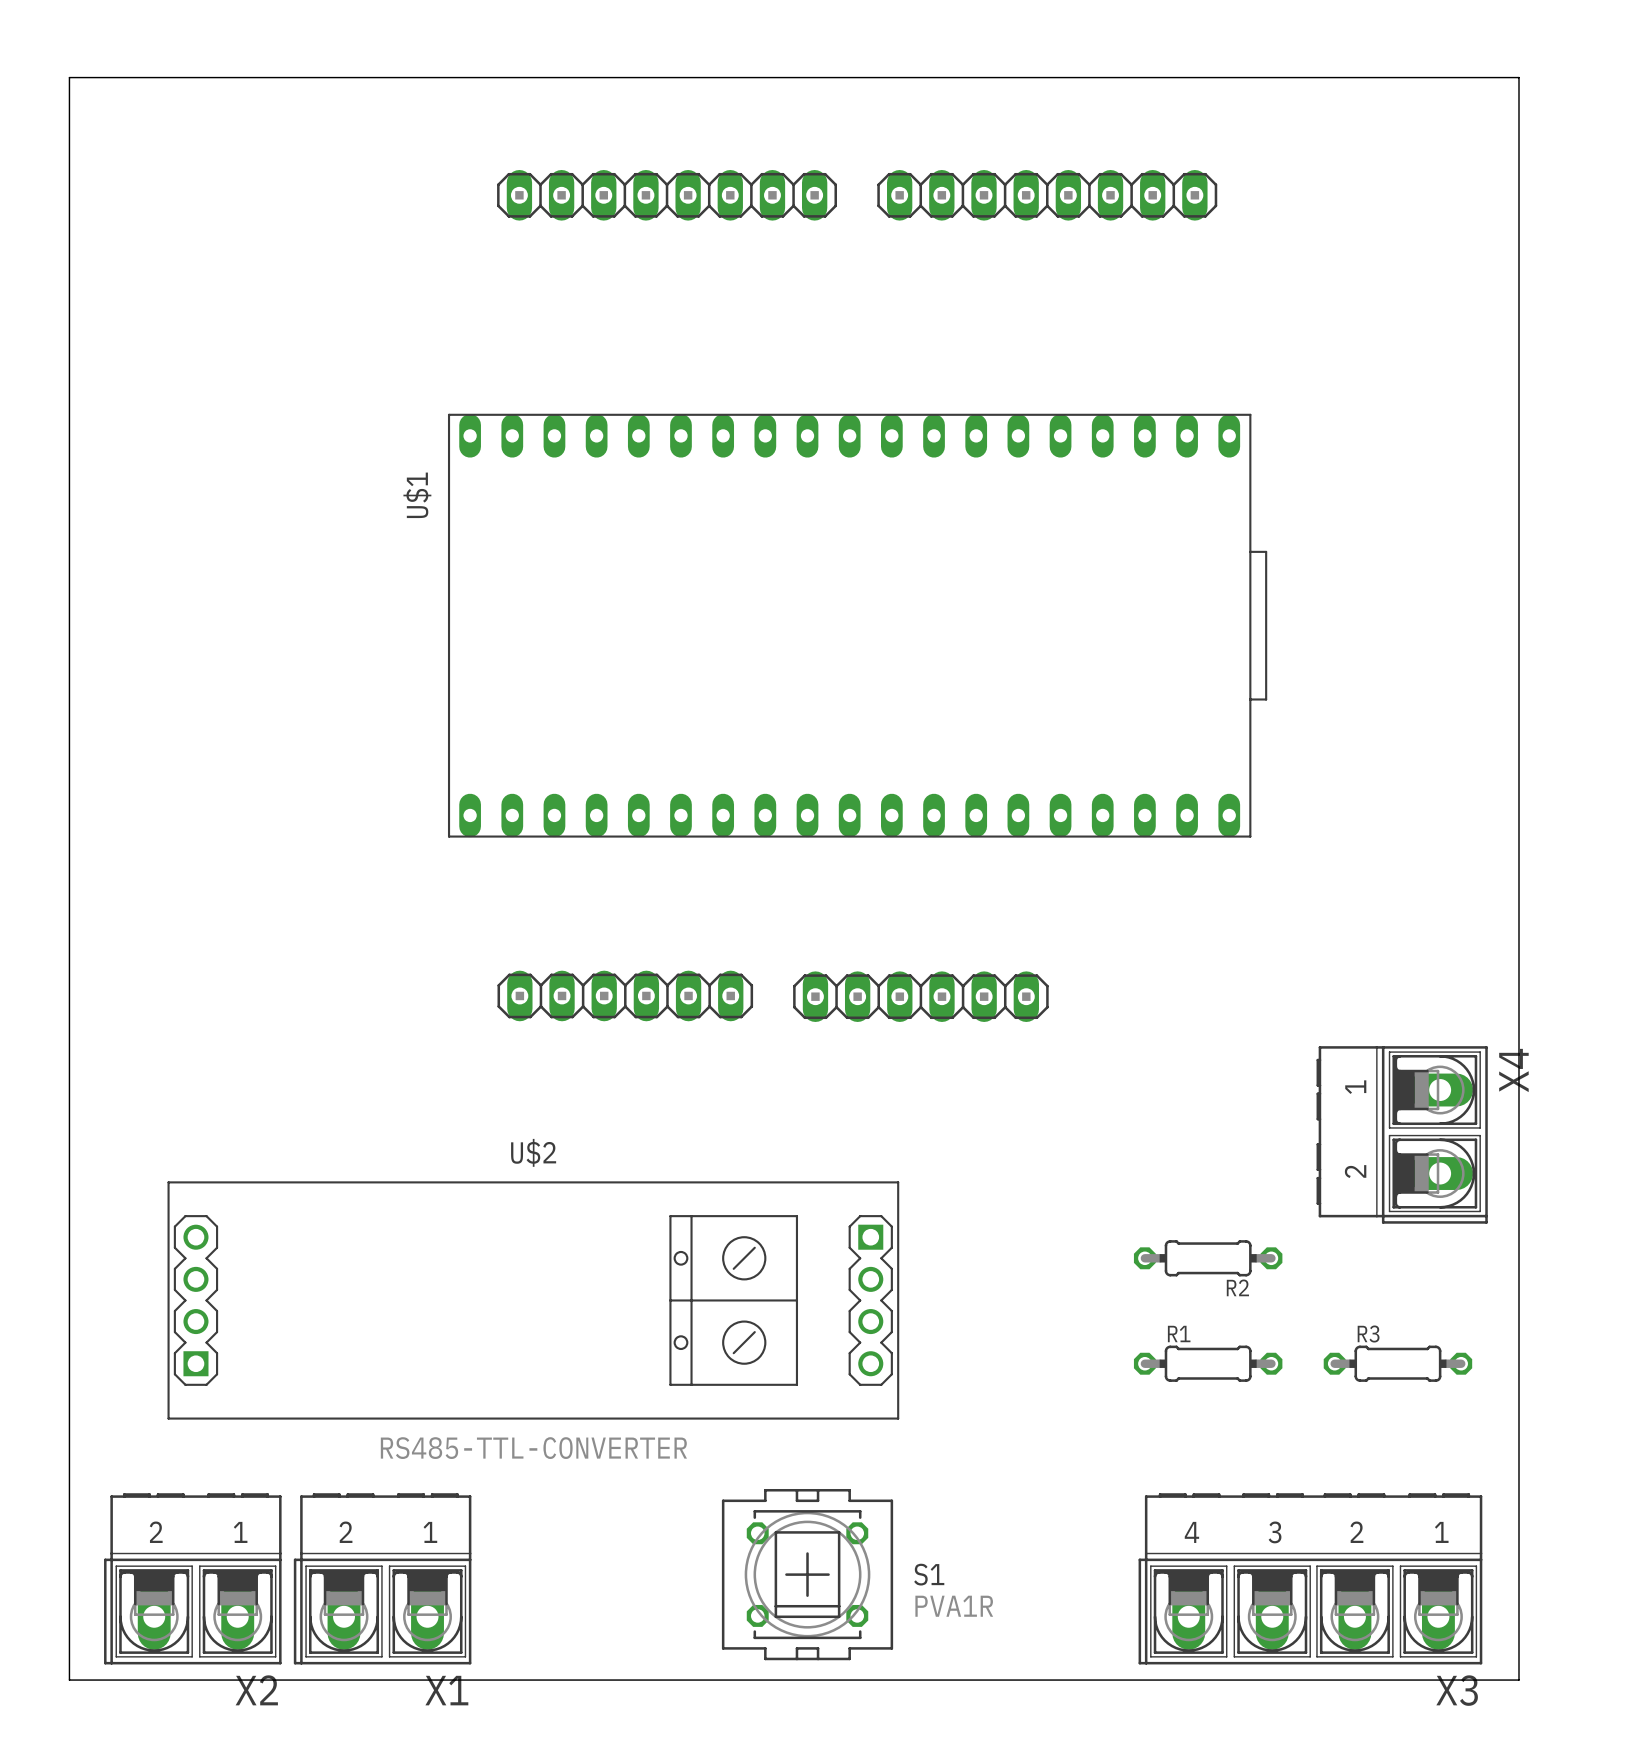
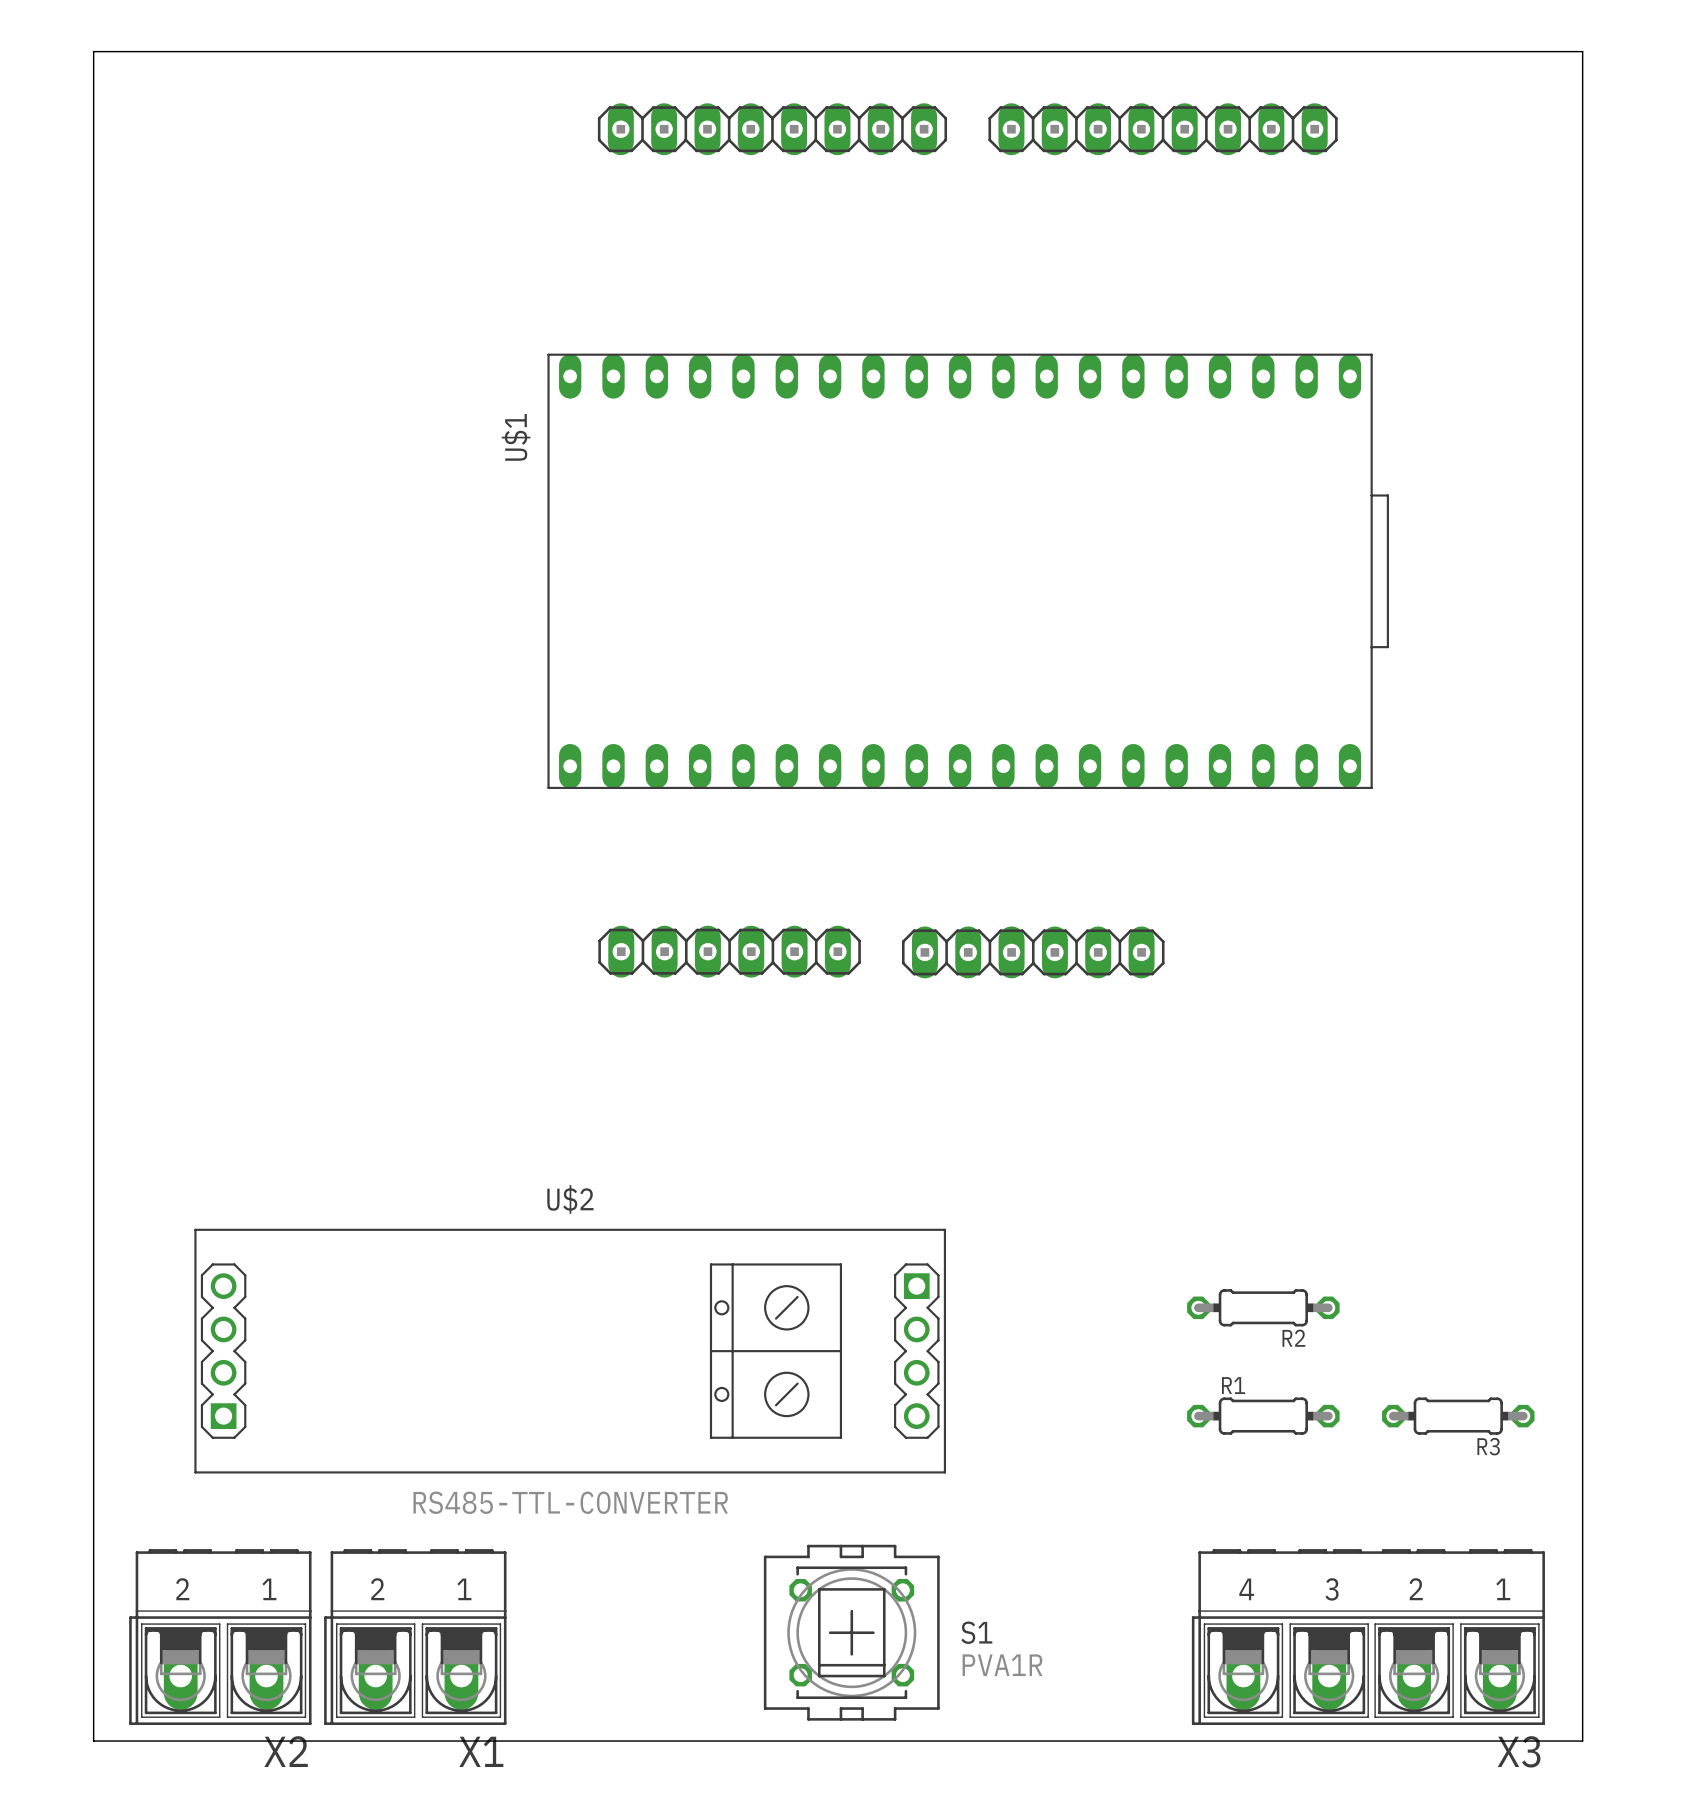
board edge: (69, 77) (1518, 77) -> (93, 94) (93, 51) (1582, 51) (1582, 94)
part position: (667, 195) -> (772, 129)
part position: (1047, 195) -> (1163, 129)
U$1 position: (857, 625) -> (968, 571)
part position: (625, 995) -> (729, 951)
part position: (920, 996) -> (1033, 952)
X4: (1402, 1134) -> none
R3 name position: R3 (1368, 1334) -> R3 (1488, 1446)

